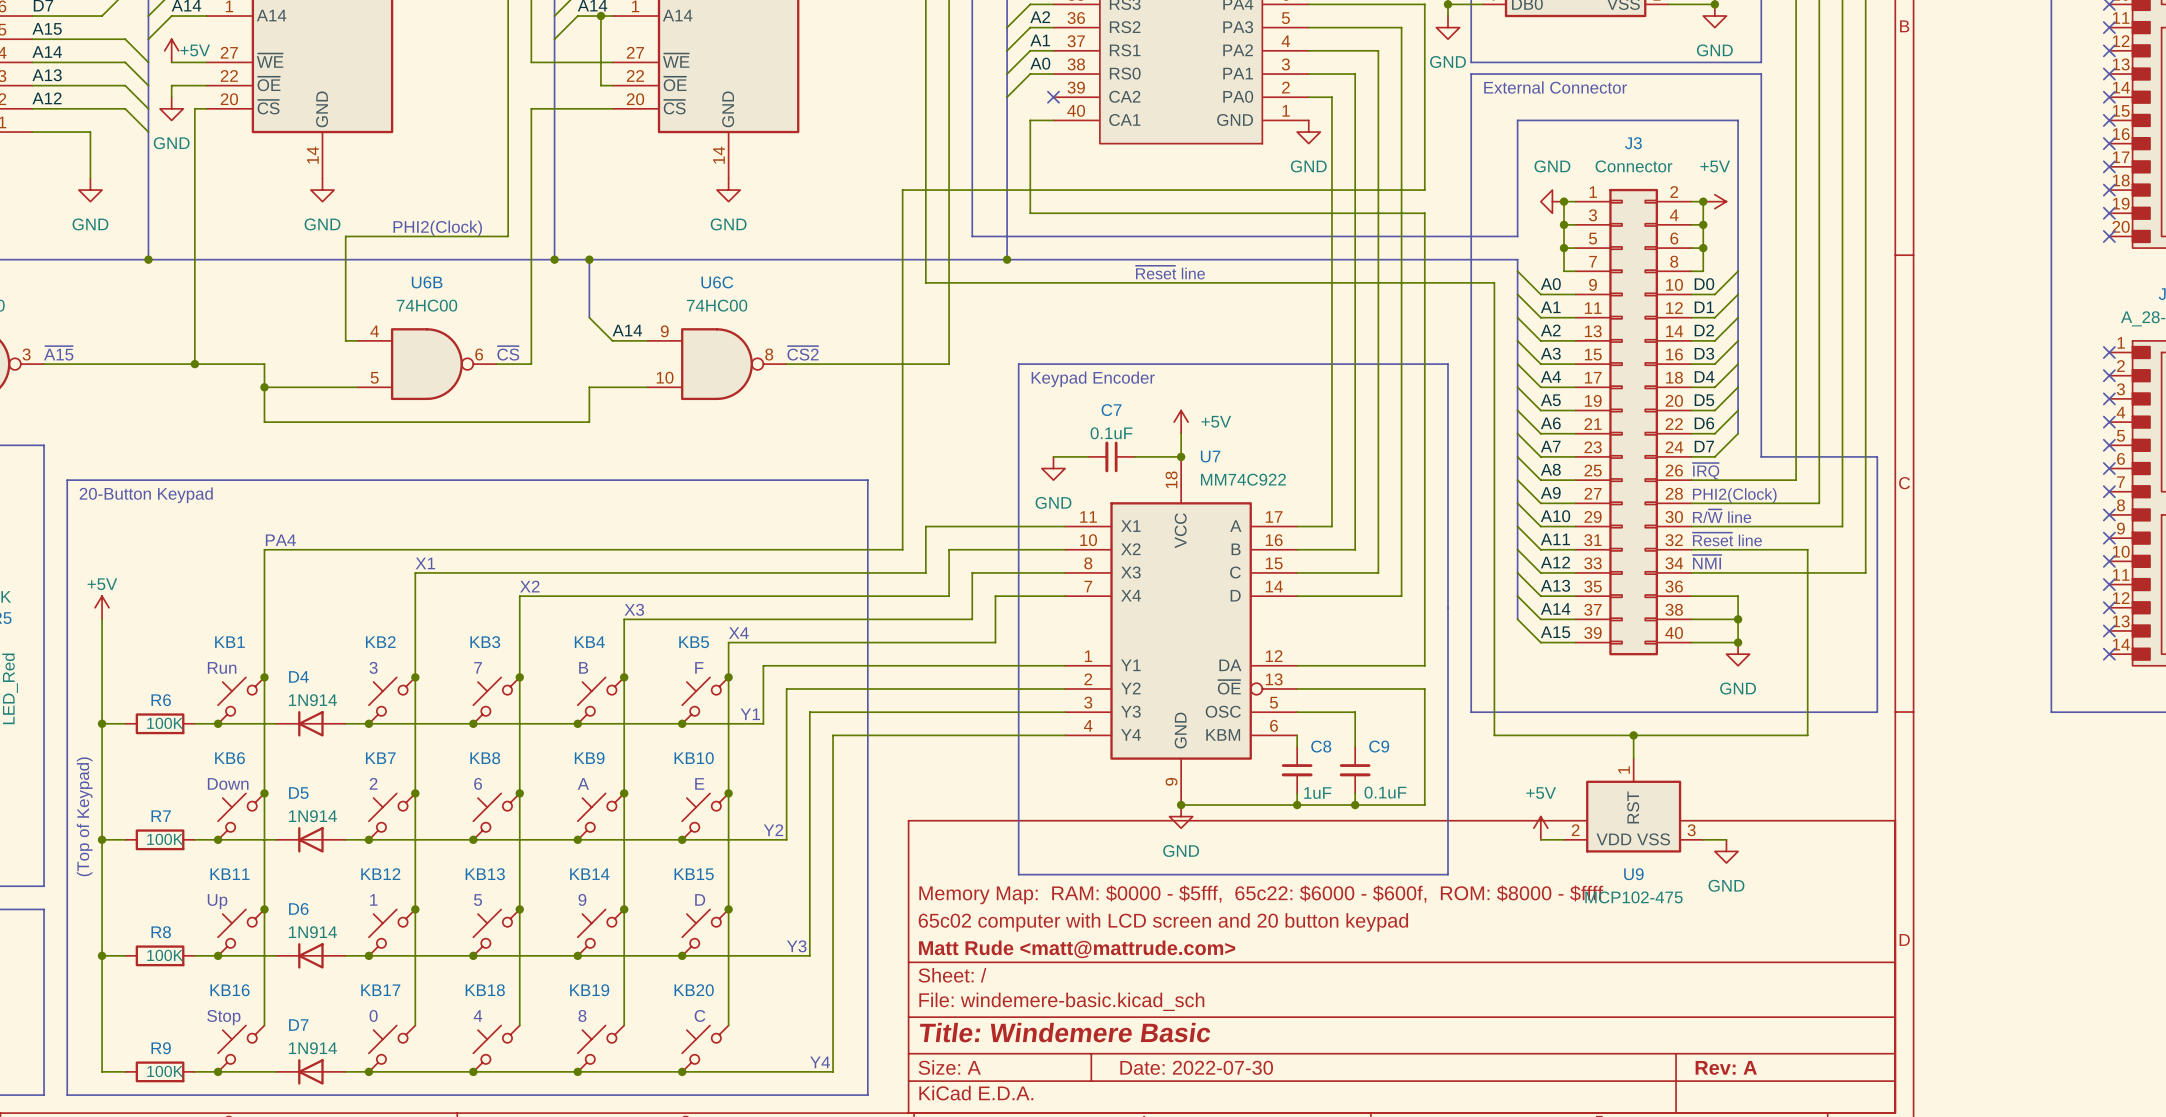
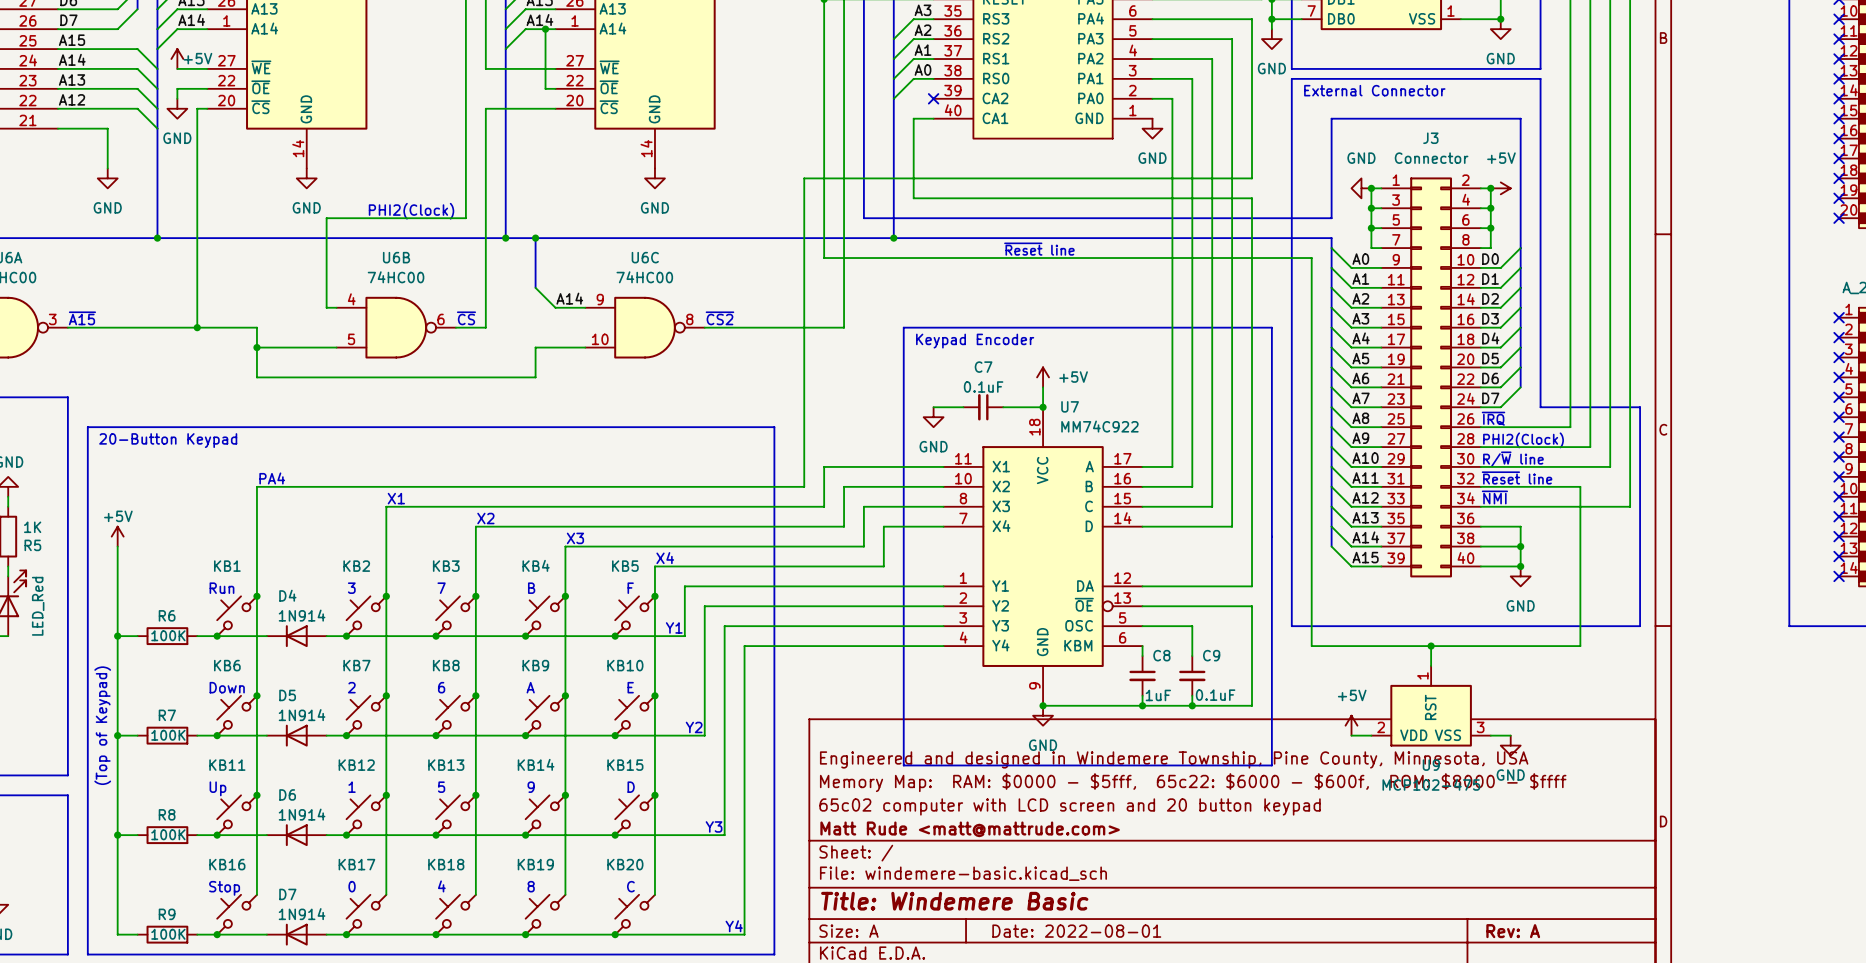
title block: none -> Engineered and designed in Windemere Township, Pine County, Minnesota, USA (1174, 759)
title block: Date: 2022-07-30 (1196, 1067) -> Date: 2022-08-01 (1076, 931)

